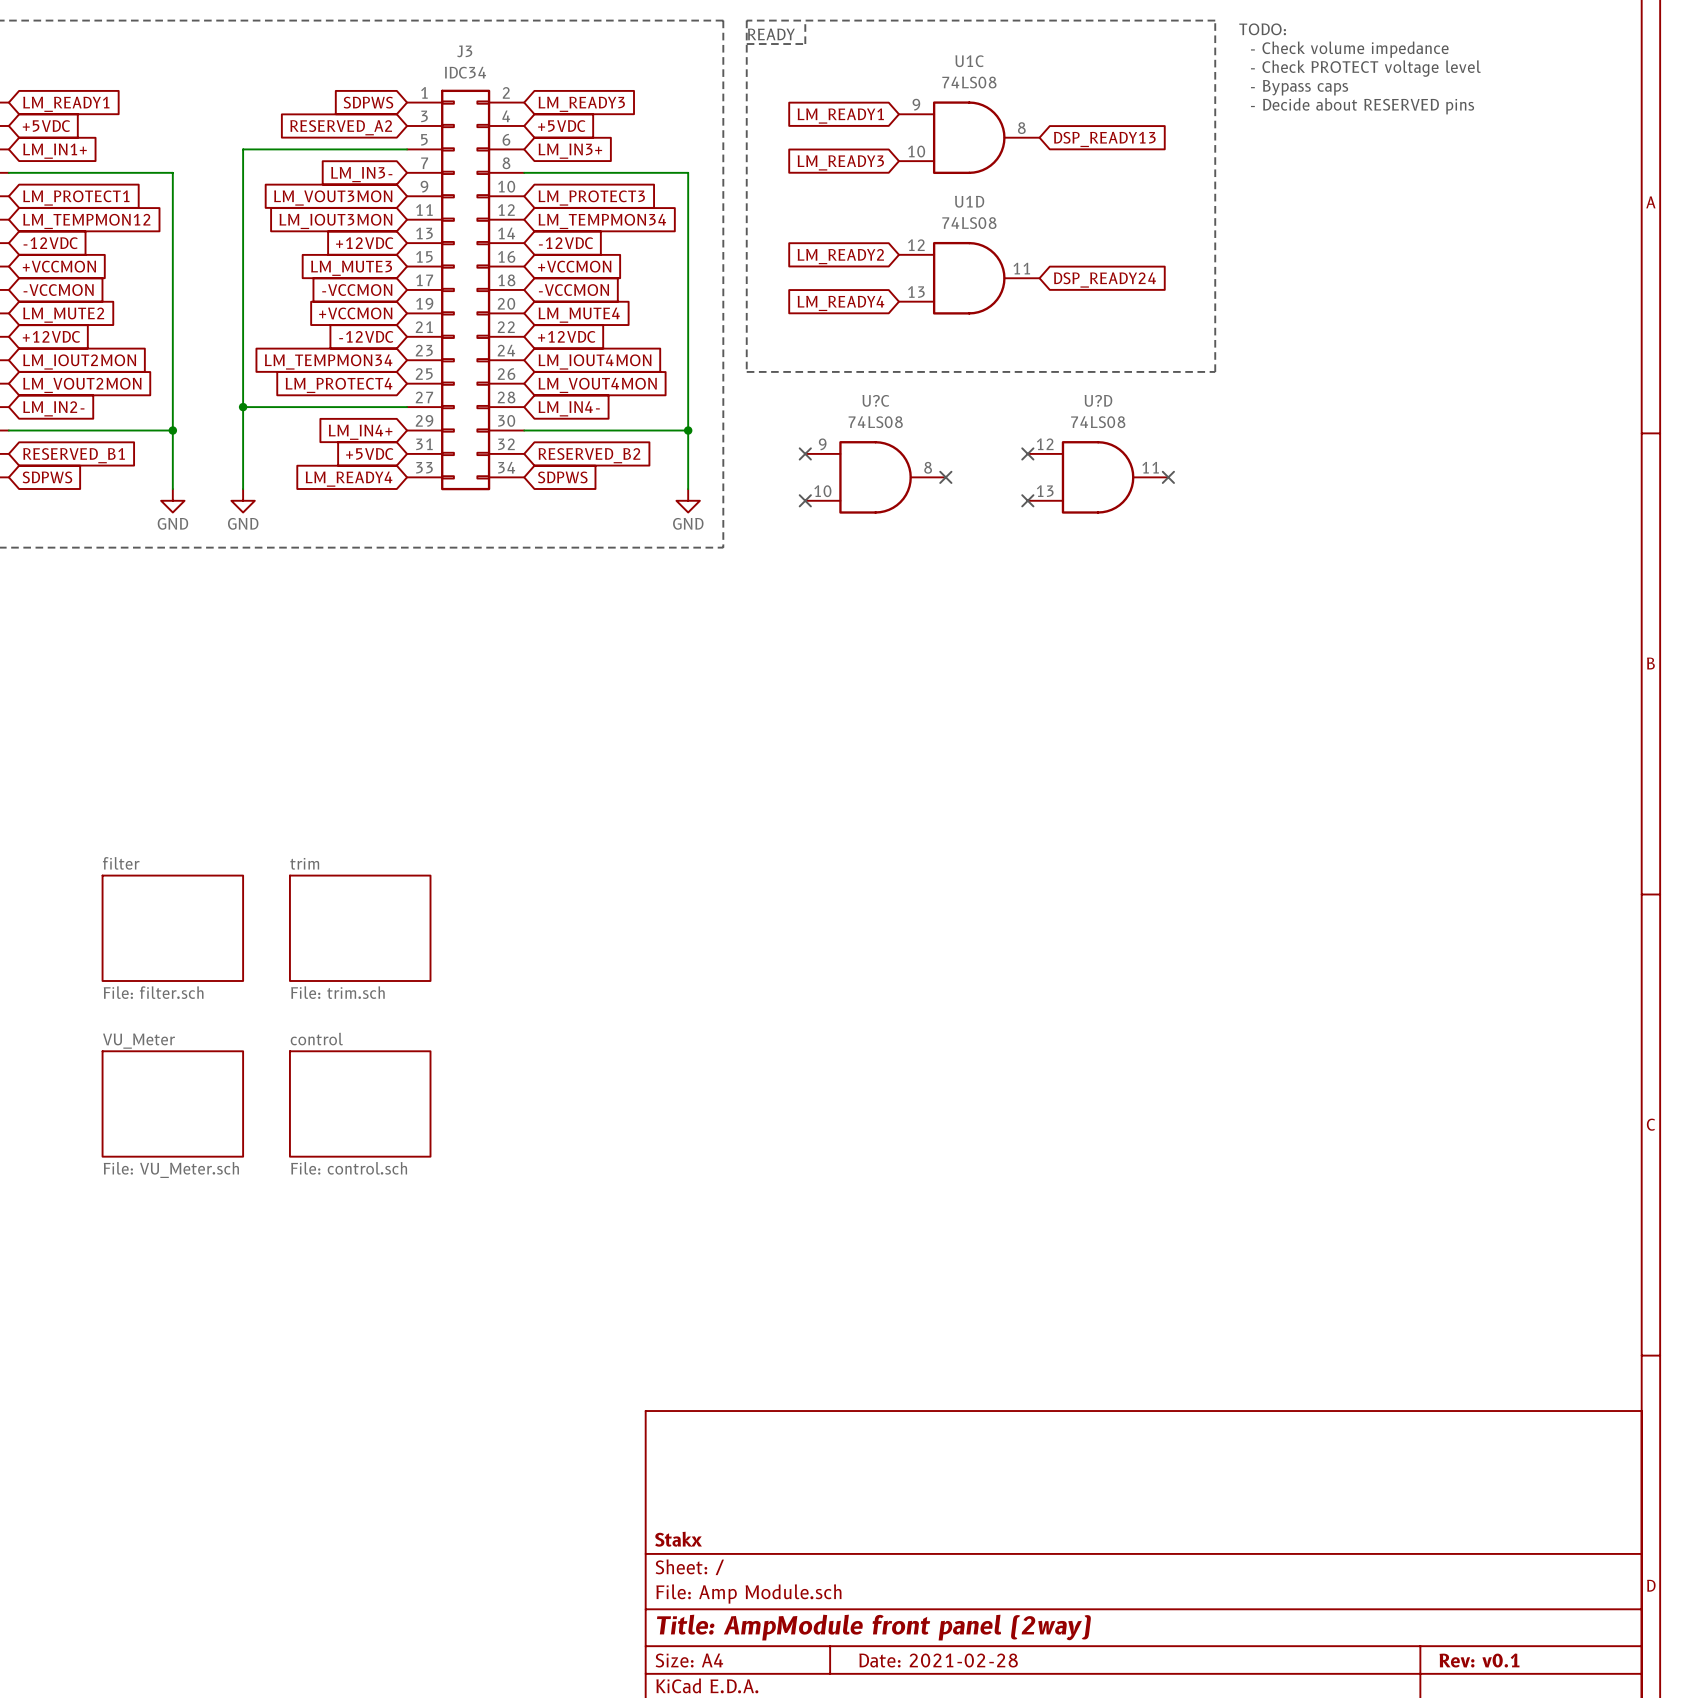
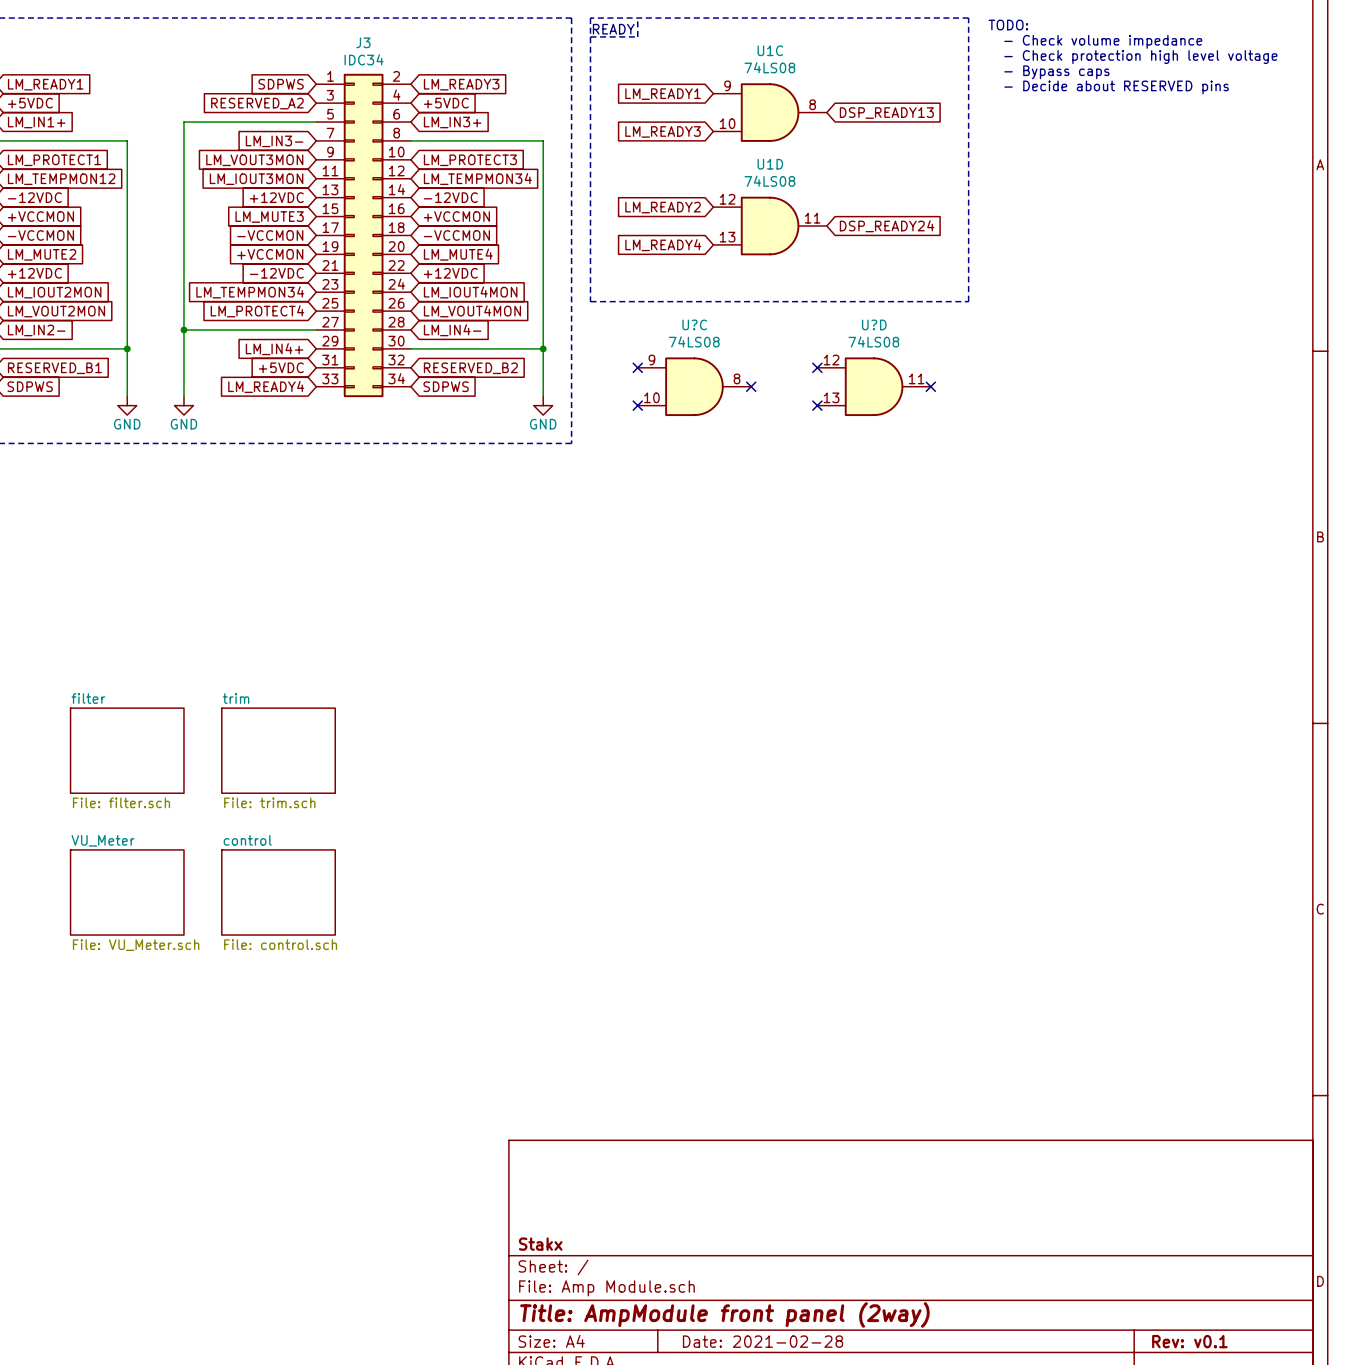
text: - Check PROTECT voltage level (1365, 68) -> - Check protection high level voltage (1140, 57)

